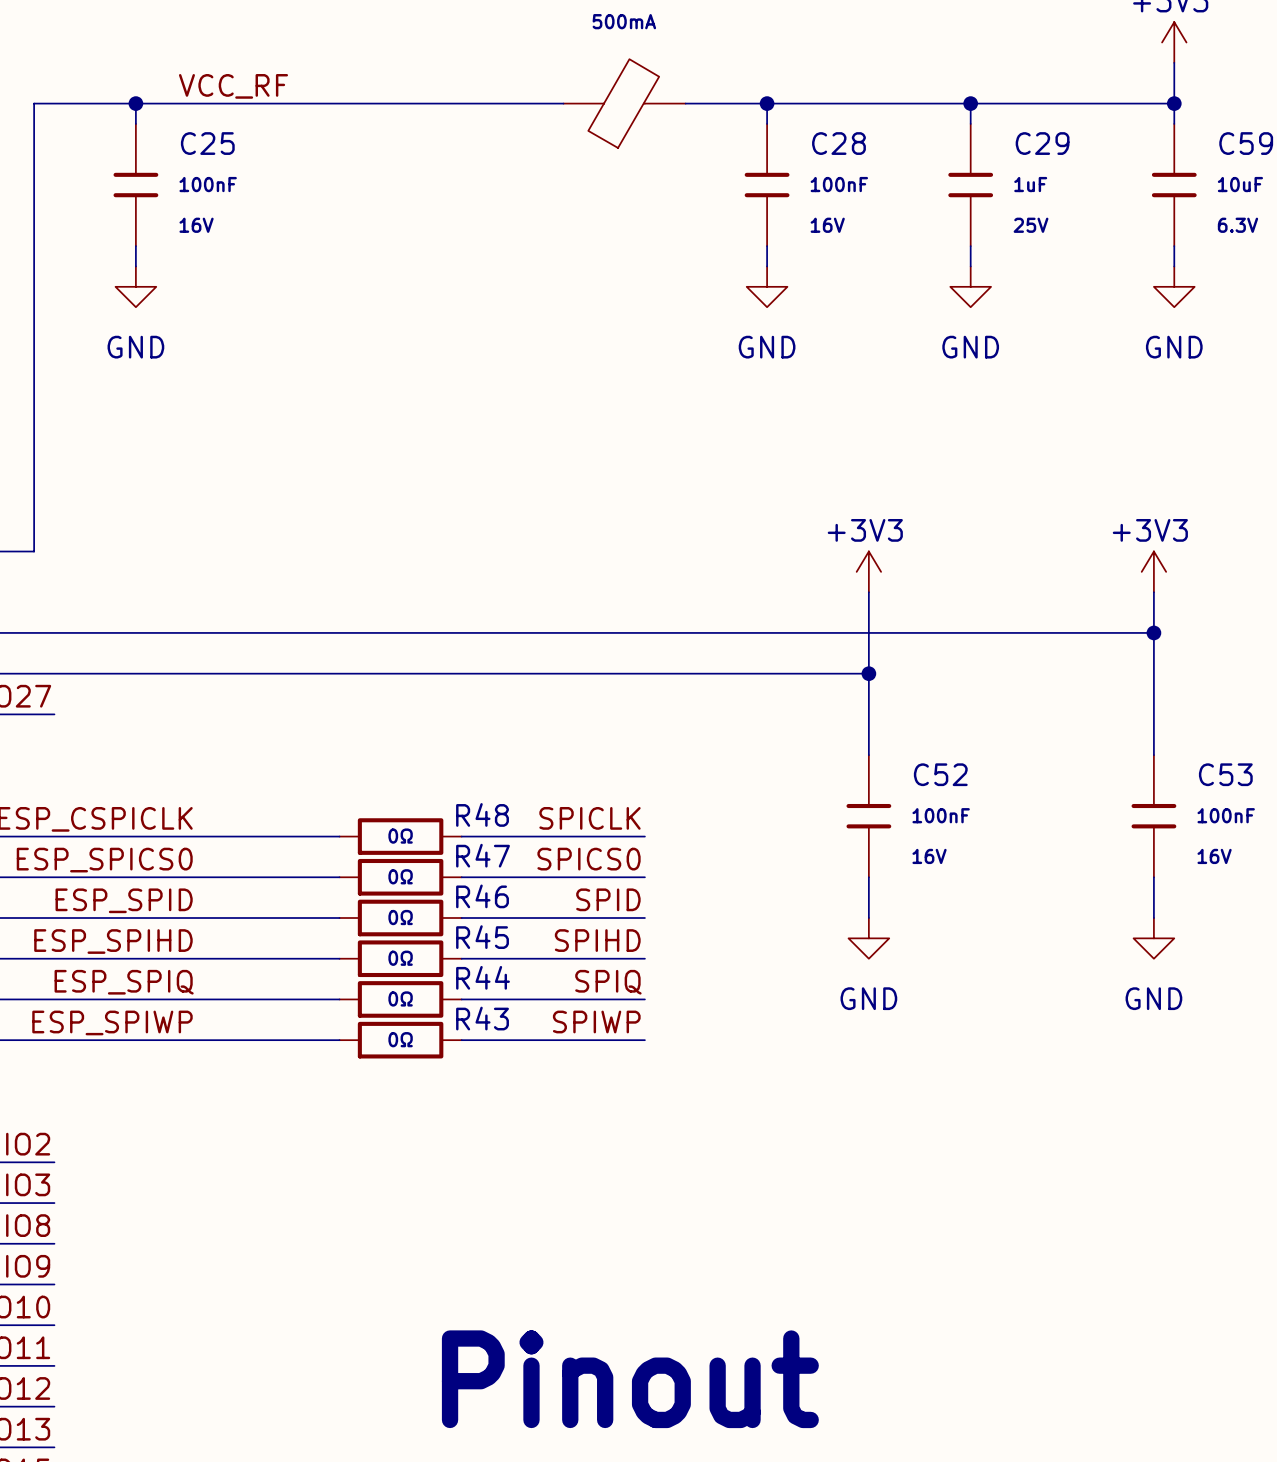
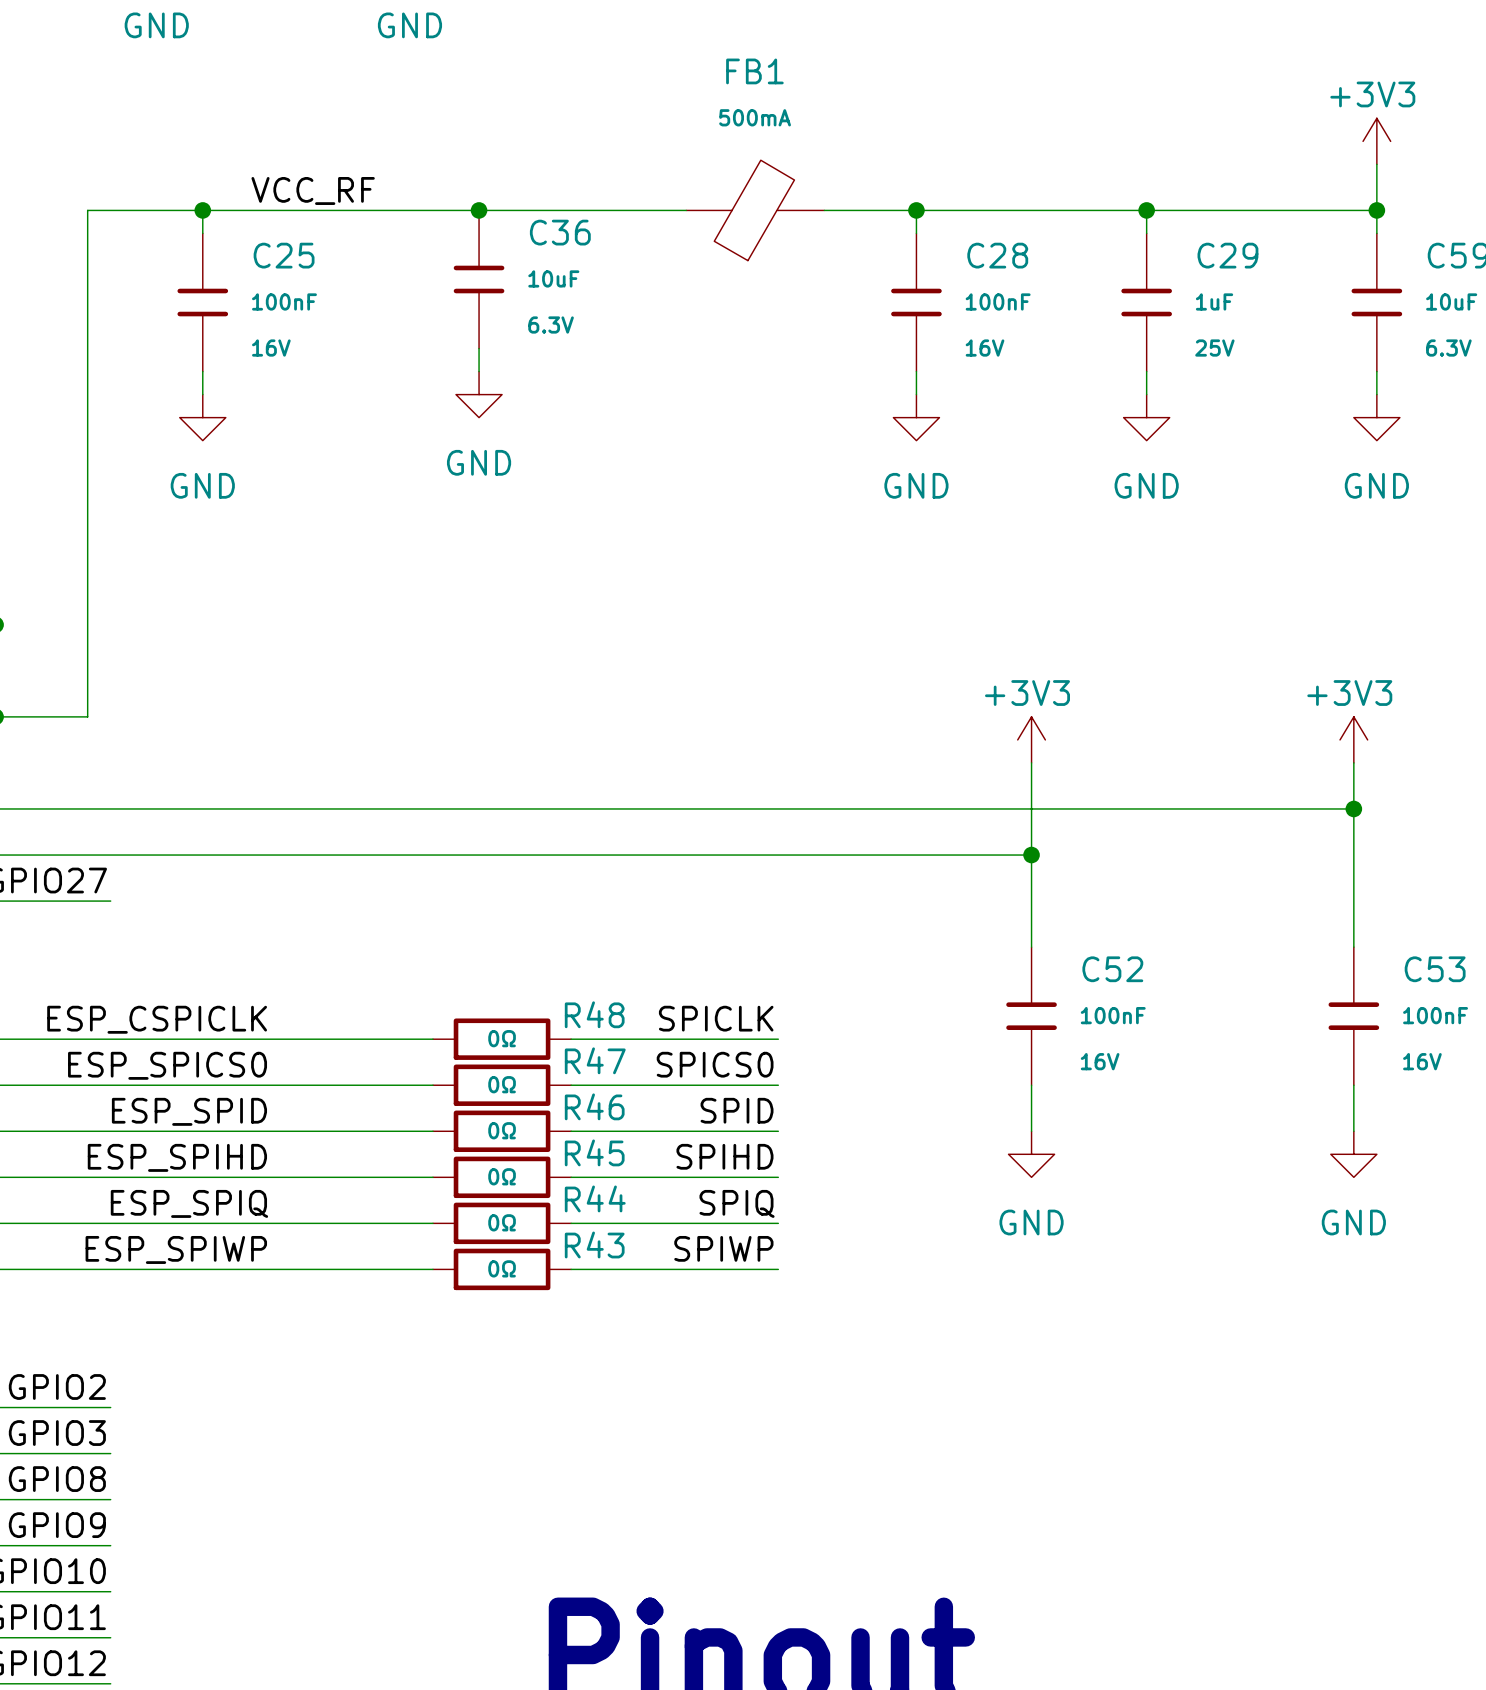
junction: none -> (479, 210)
C36: none -> 10uF (479, 279)
wire: none -> (479, 348) (479, 371)
power symbol: none -> GND (479, 394)

